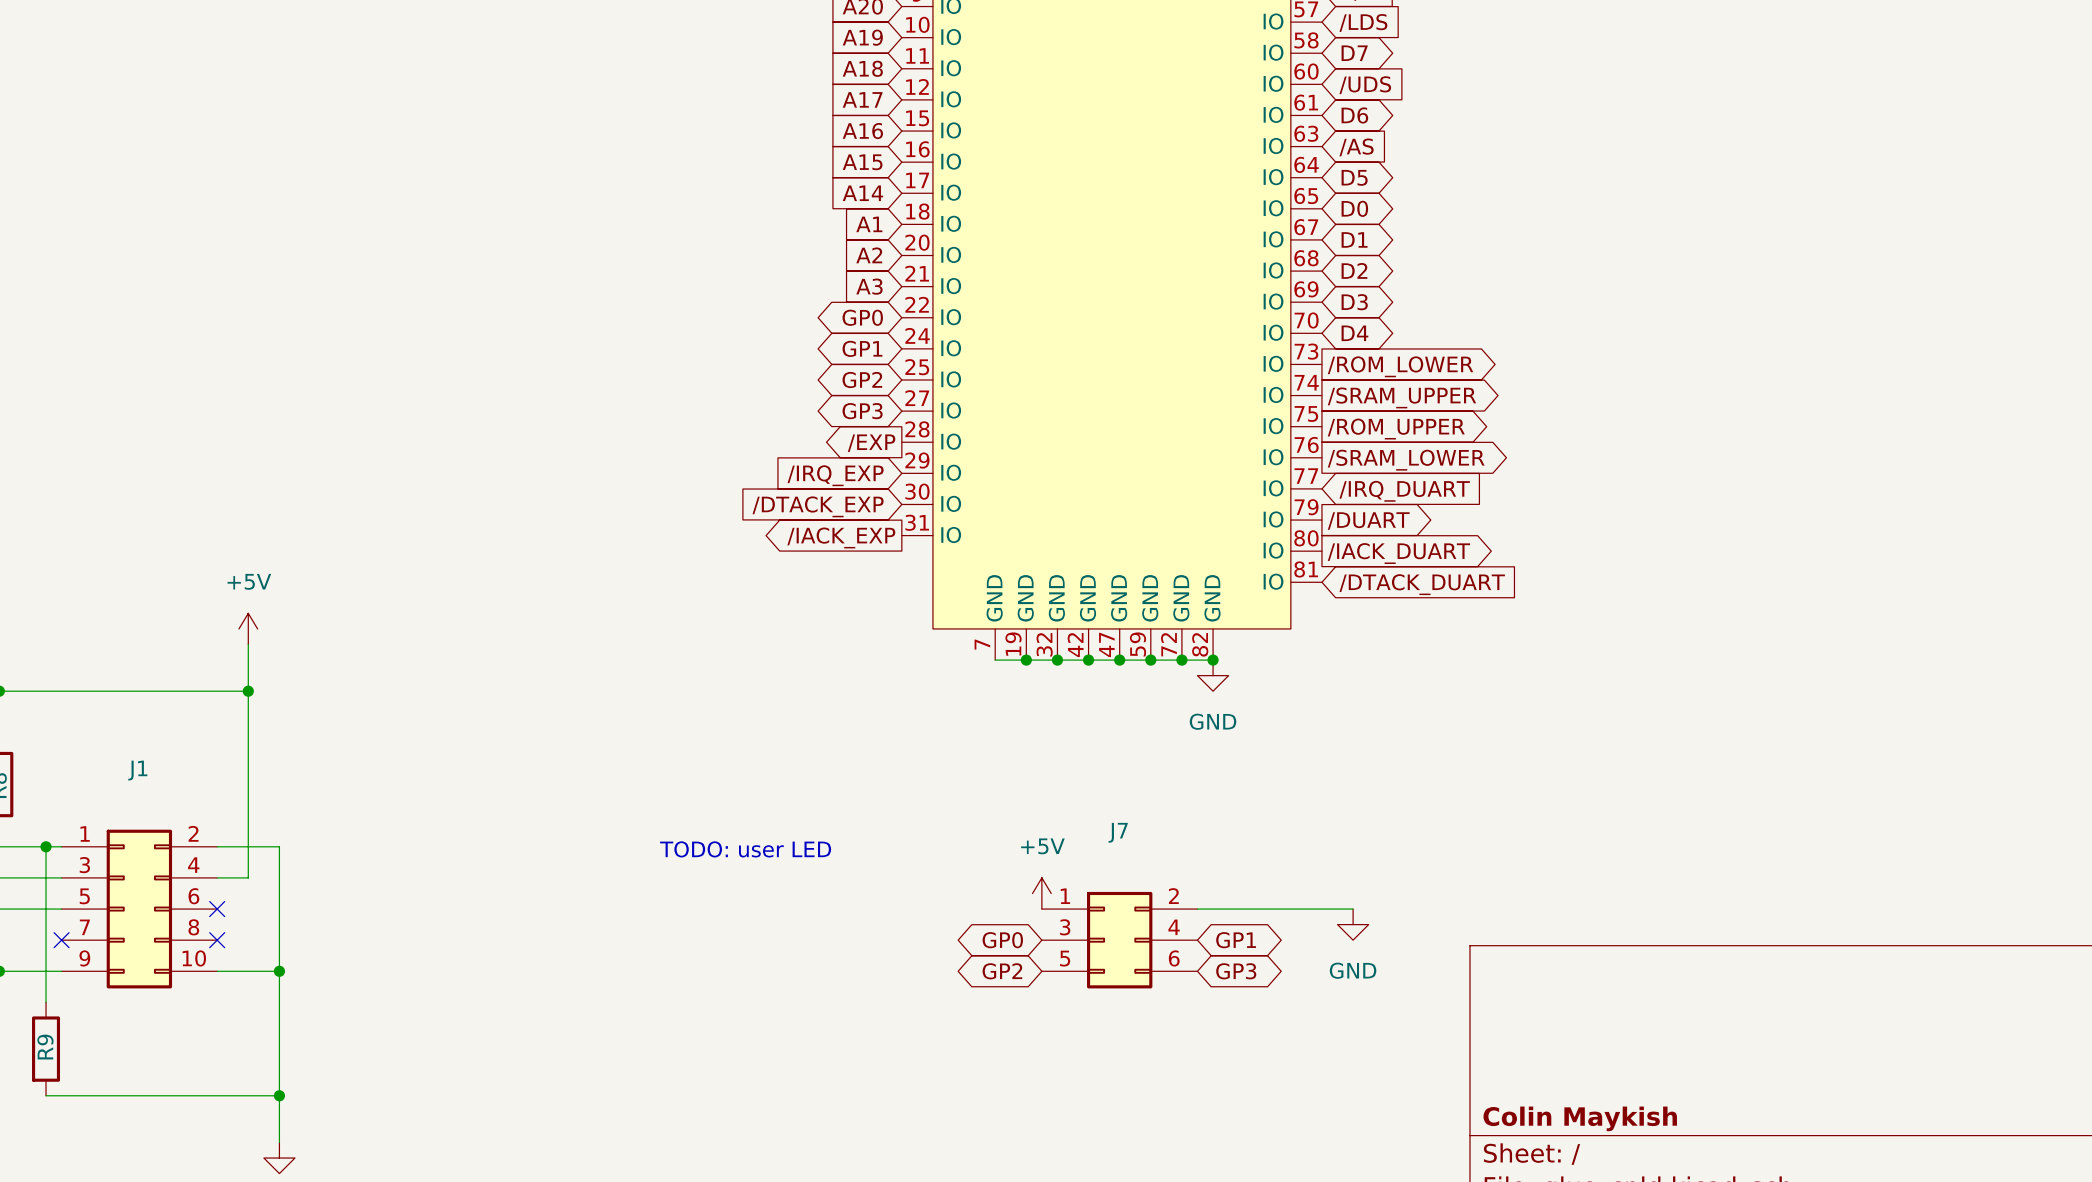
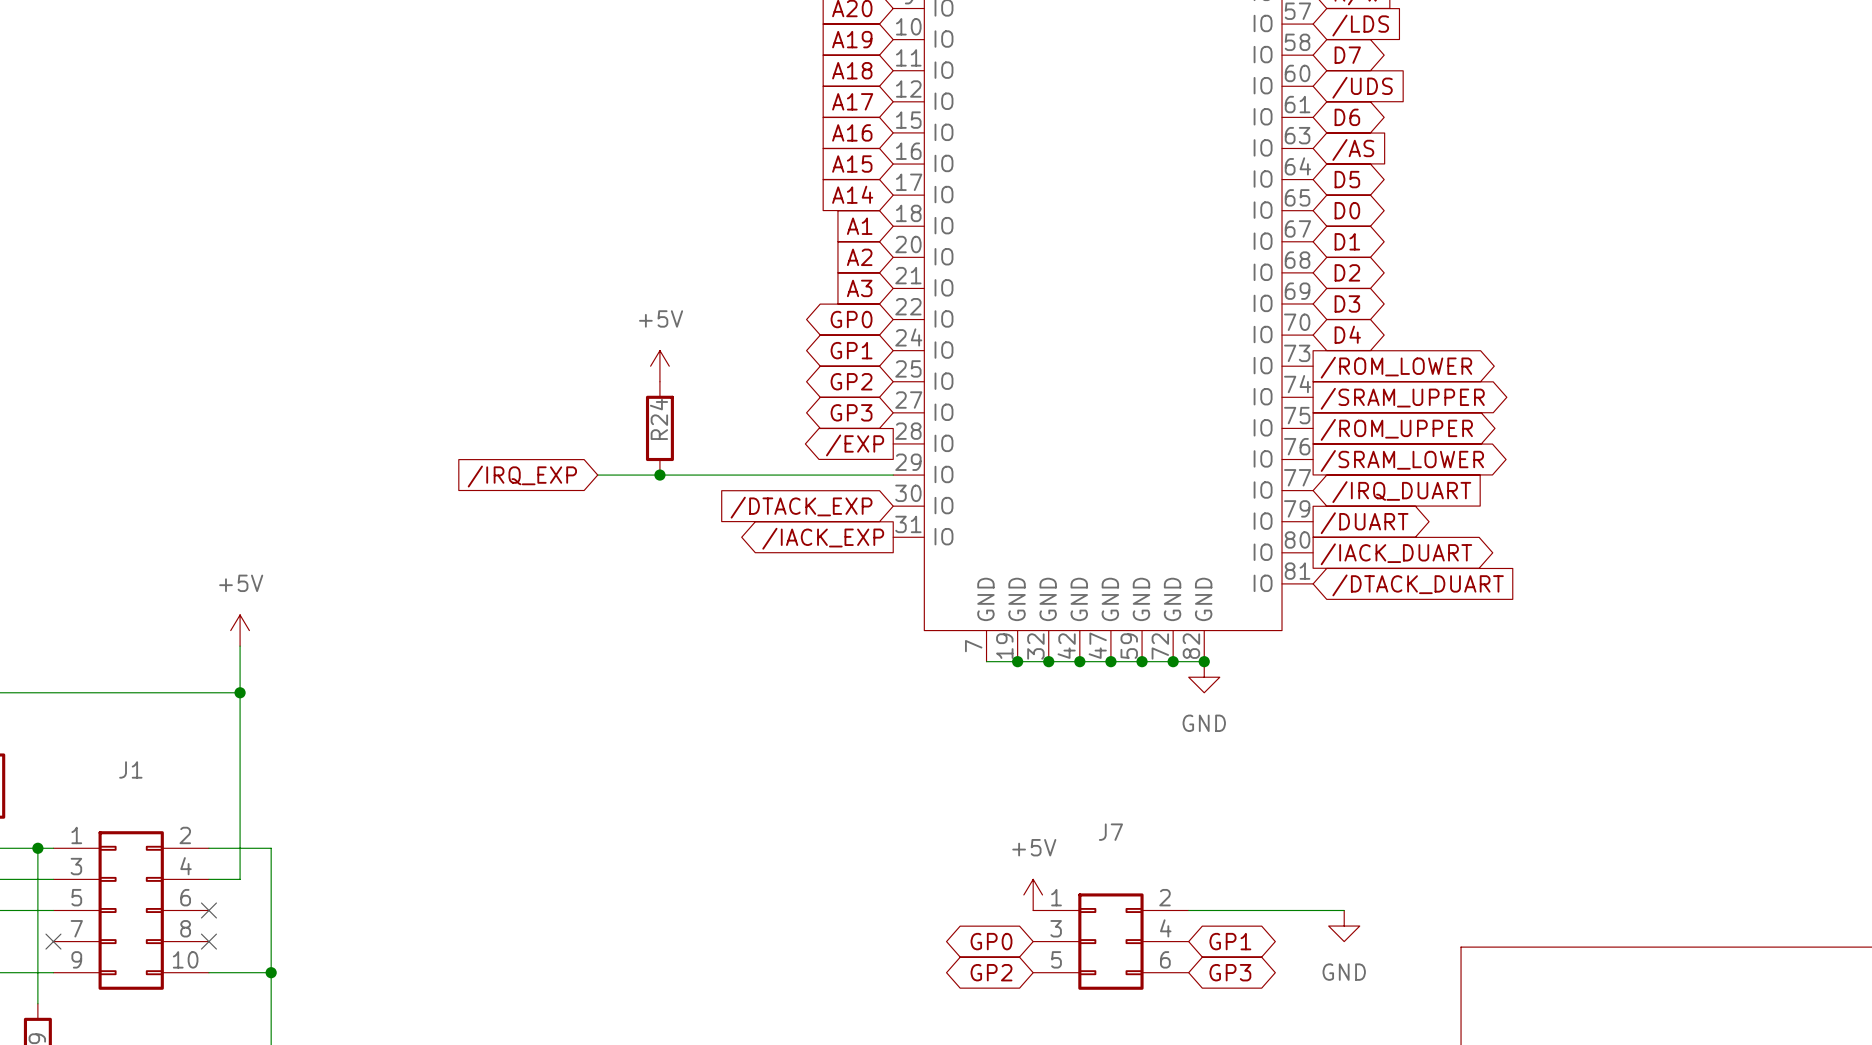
power symbol: none -> +5V (659, 366)
R24: none -> (659, 428)
wire: none -> (597, 475) (893, 475)
junction: none -> (659, 475)
global label position: /IRQ_EXP (835, 475) -> /IRQ_EXP (522, 476)
text: TODO: user LED (745, 849) -> none

